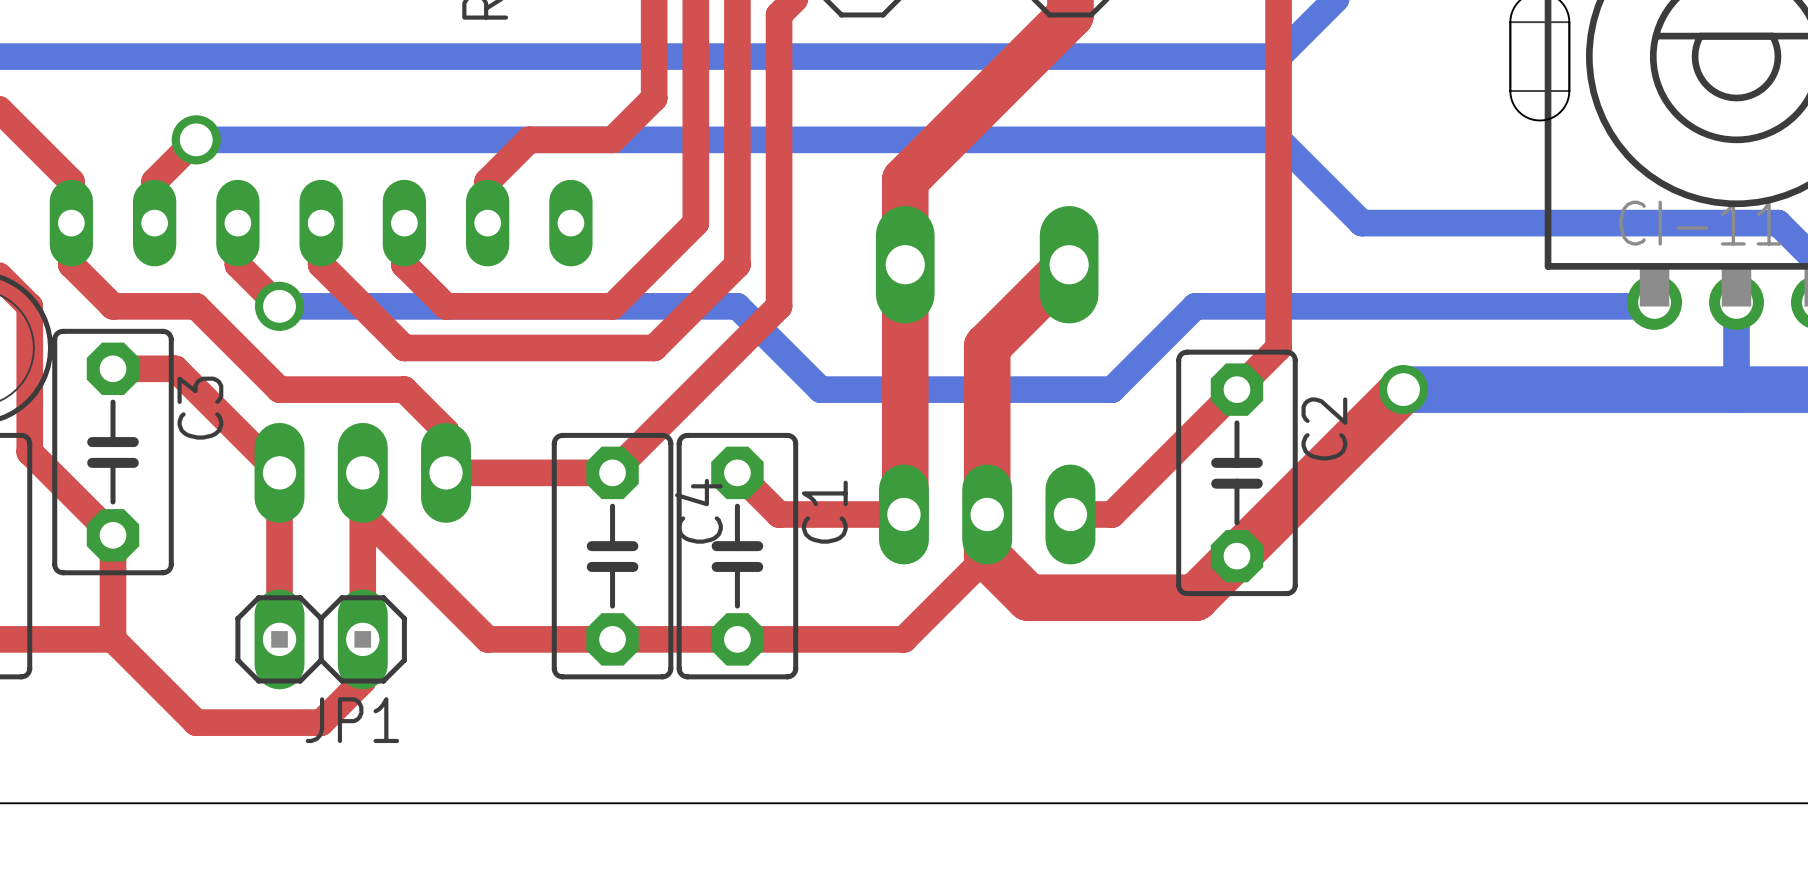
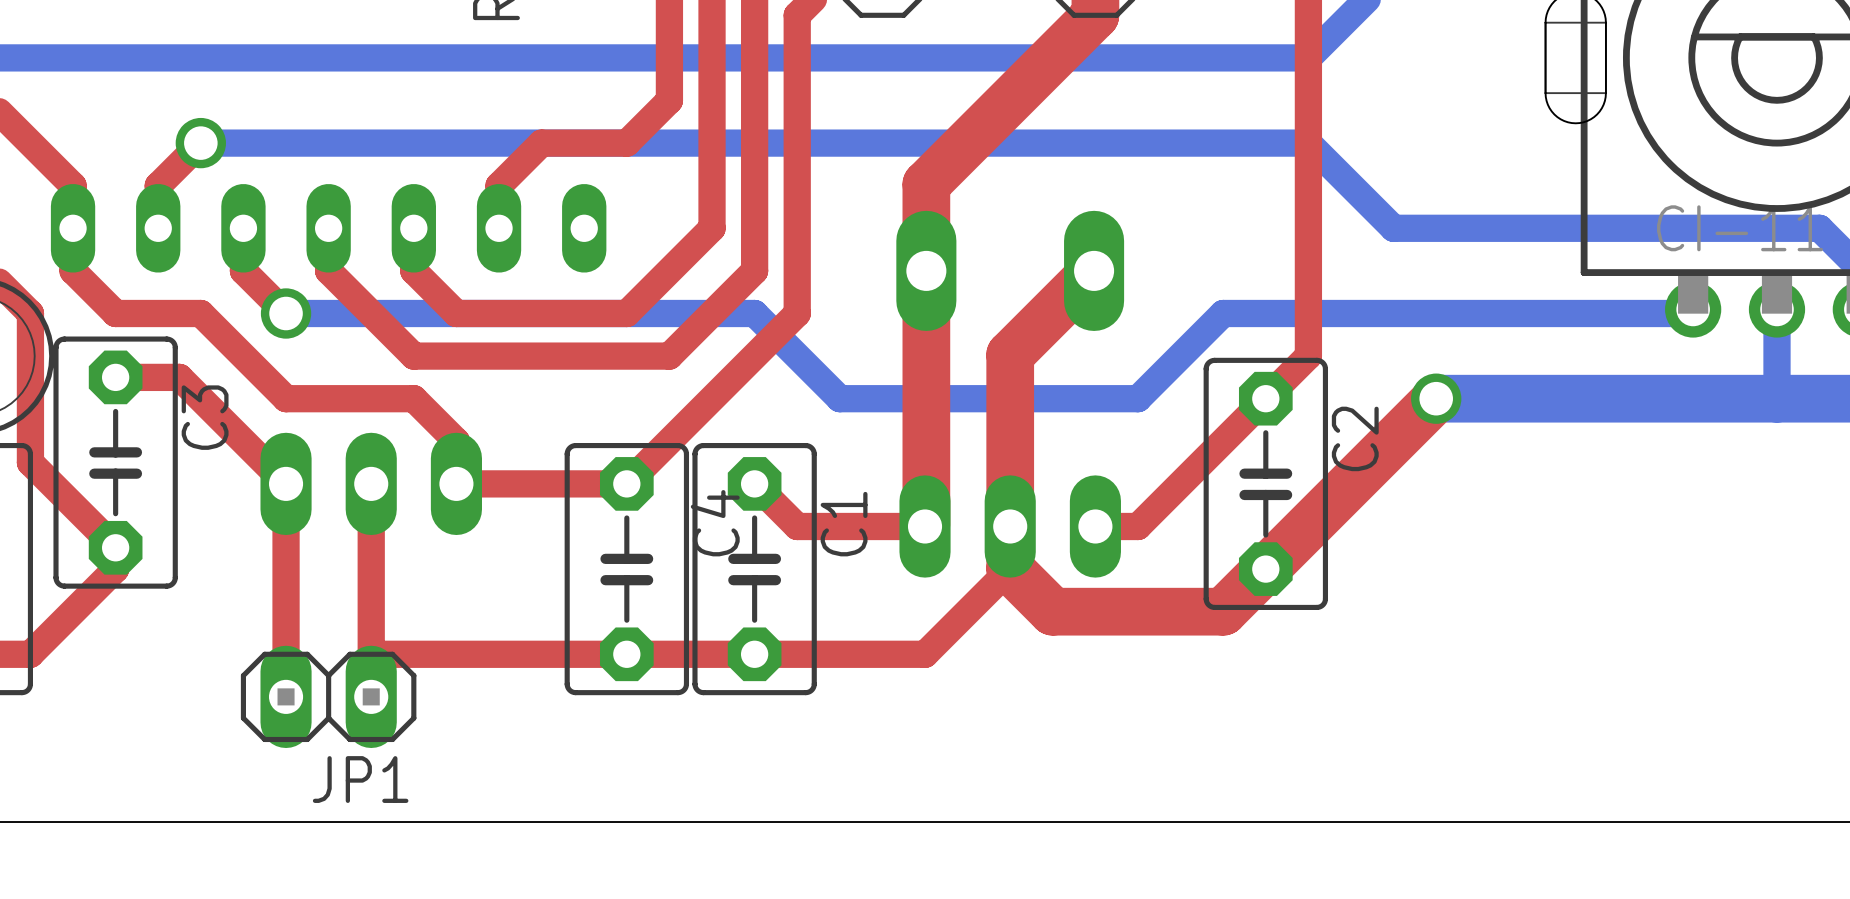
top track: (362, 514) (487, 639) -> (371, 654) (499, 654)
top track: (113, 556) (113, 639) -> (115, 569) (30, 654)
top track: (29, 639) (113, 639) -> none
top track: (113, 639) (196, 722) (321, 722) (362, 681) -> none
JP1 position: (321, 639) -> (328, 696)

